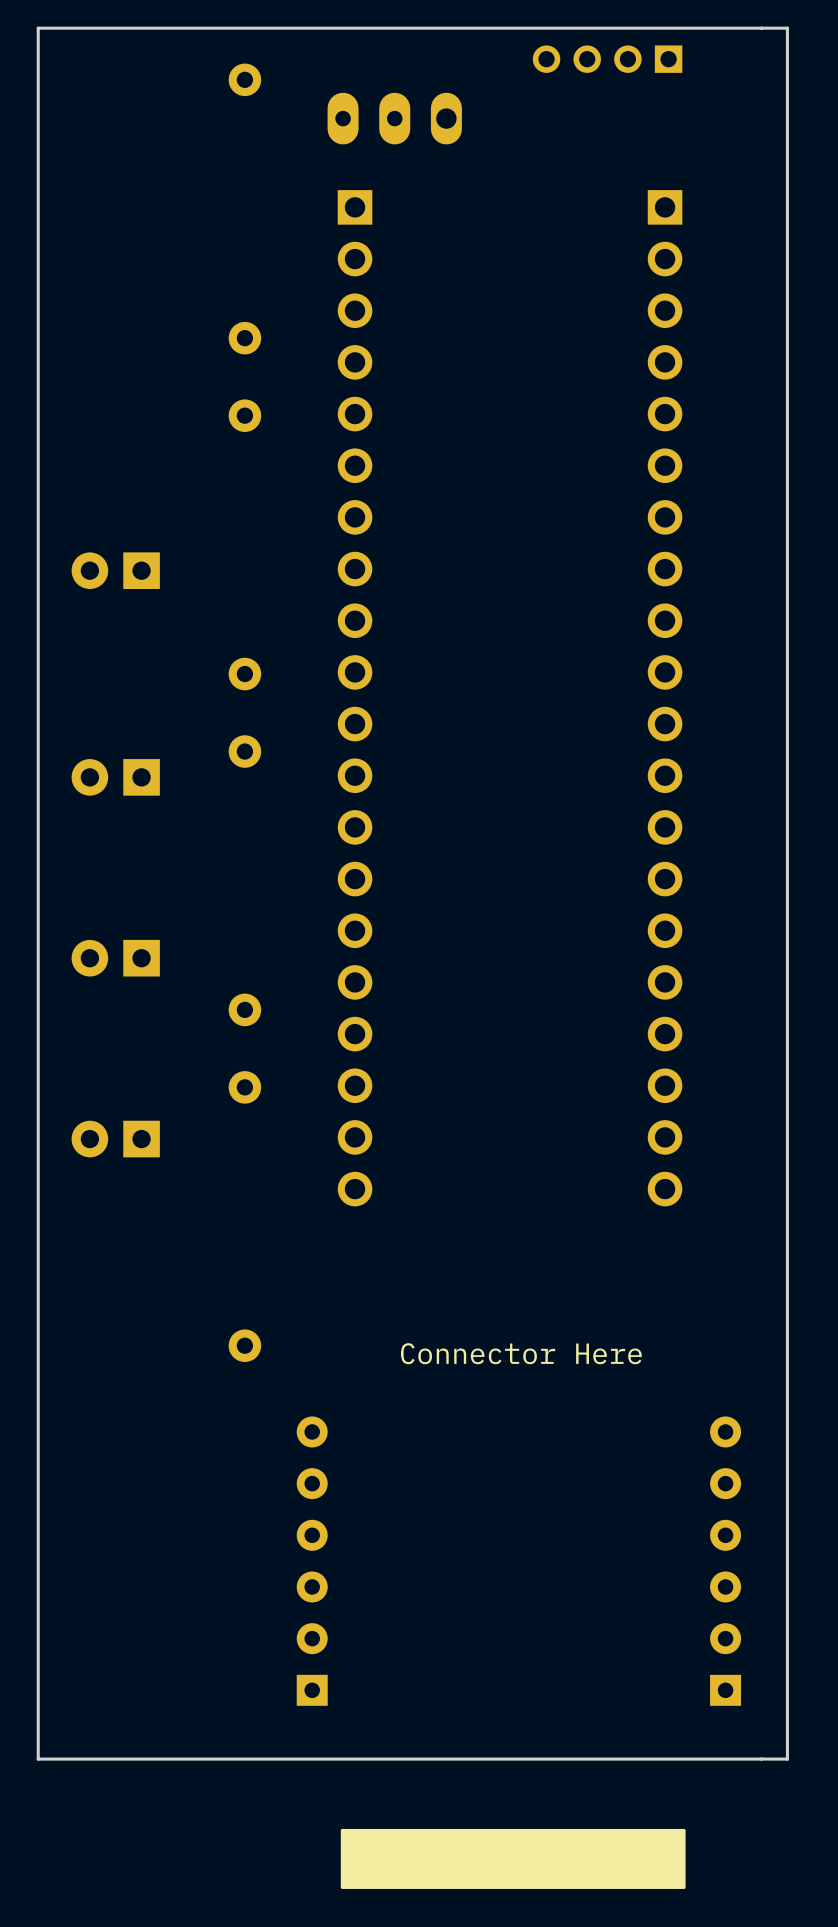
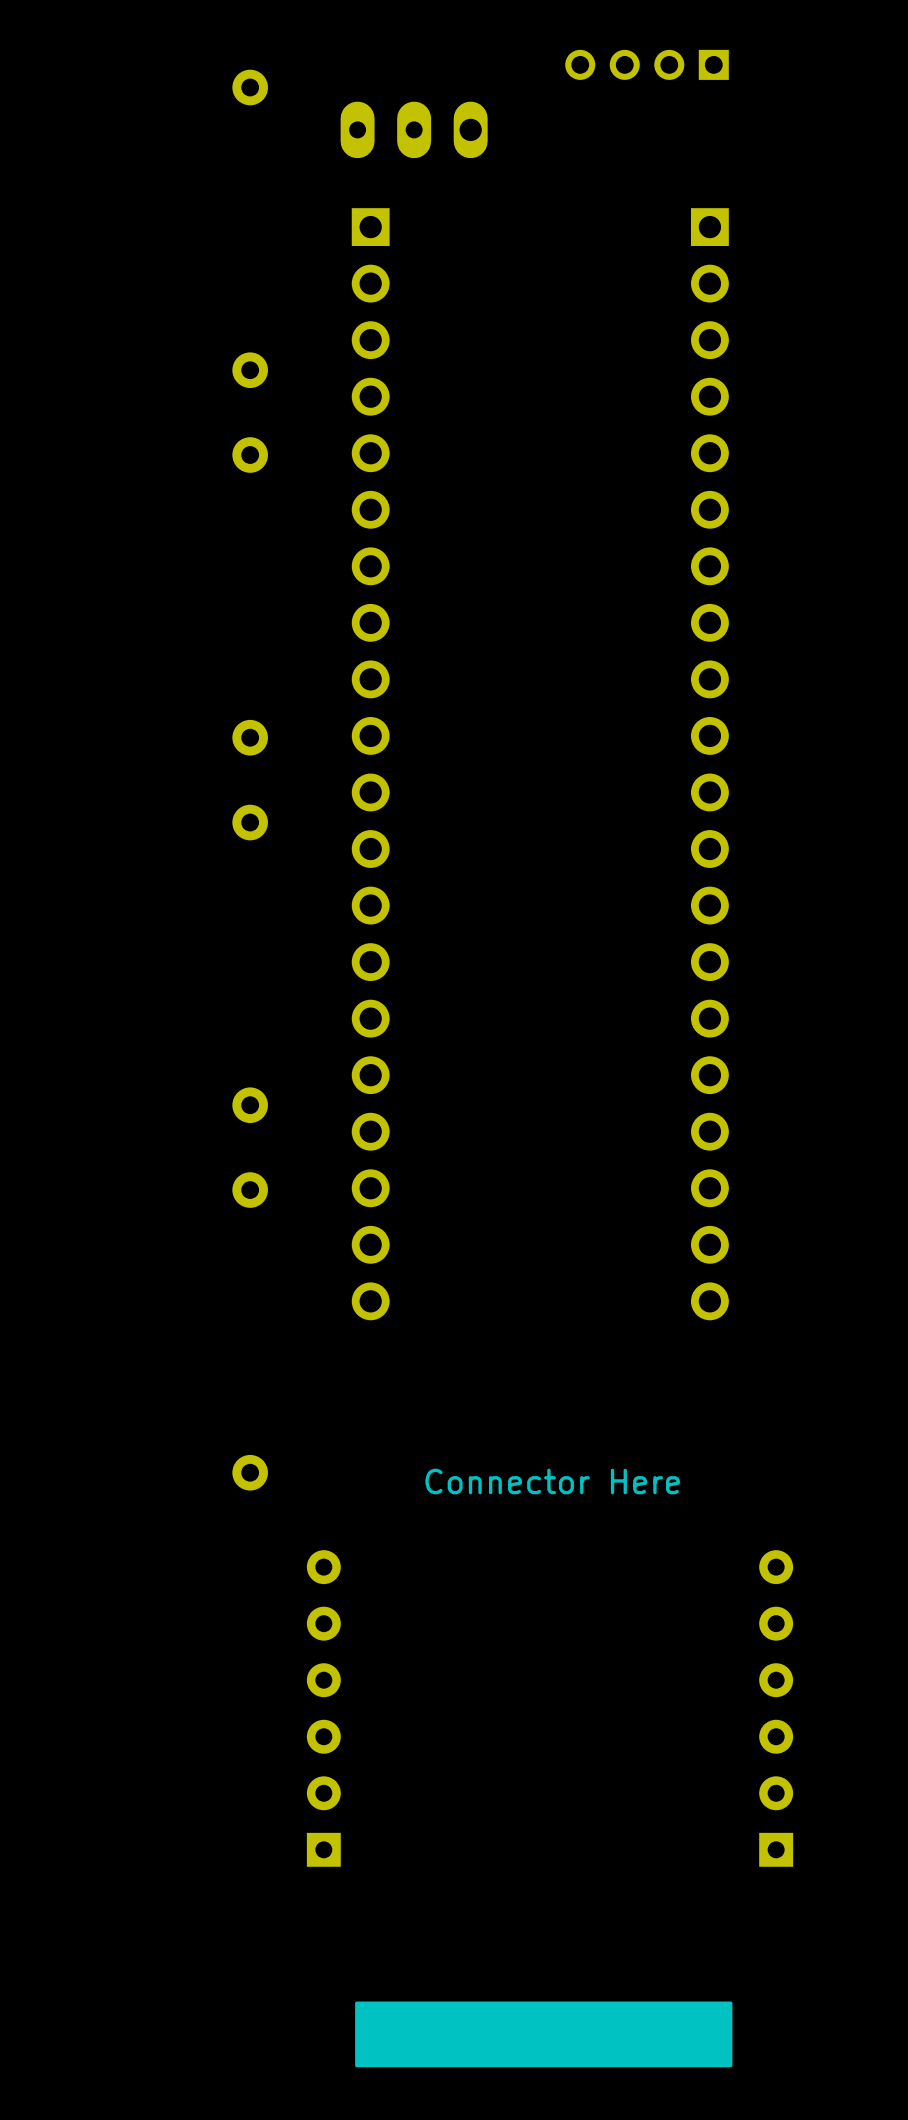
board edge: (787, 28) (787, 1759) (38, 1759) (38, 28) (787, 28) -> none
part: (115, 570) -> none
part: (115, 777) -> none
part: (115, 958) -> none
part: (115, 1139) -> none

